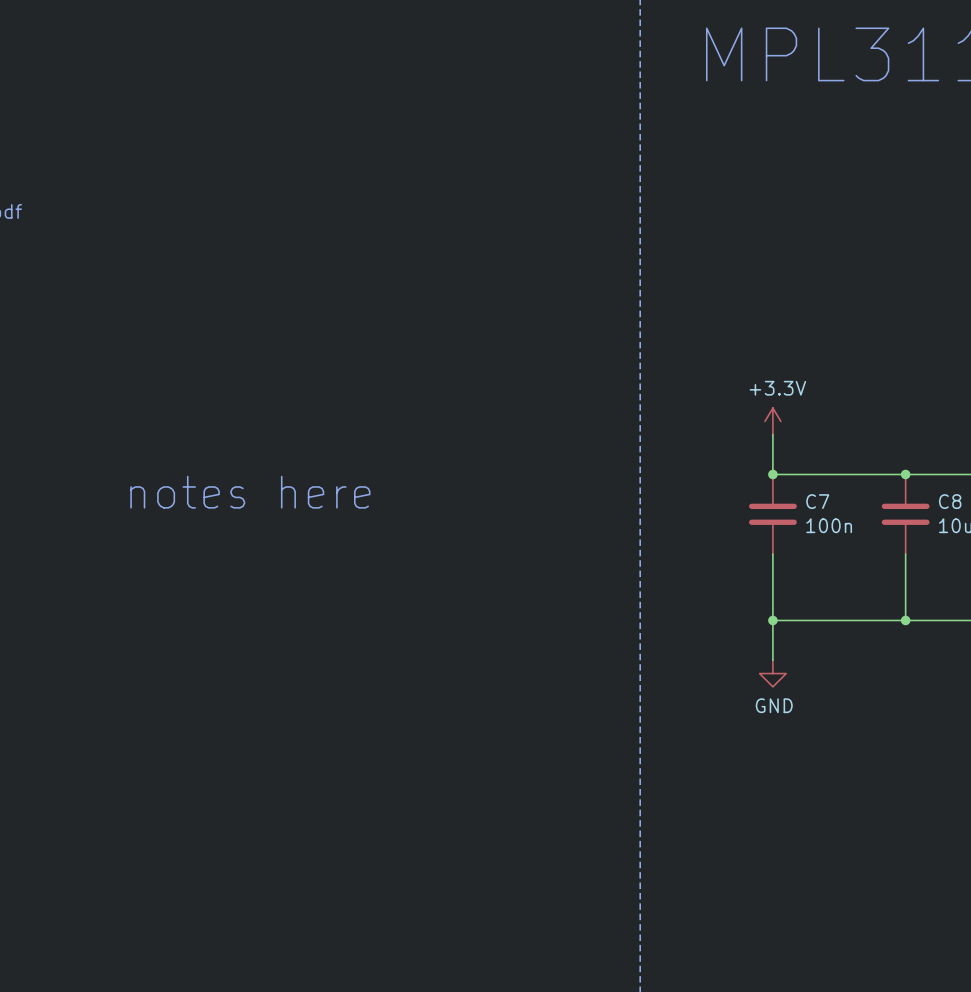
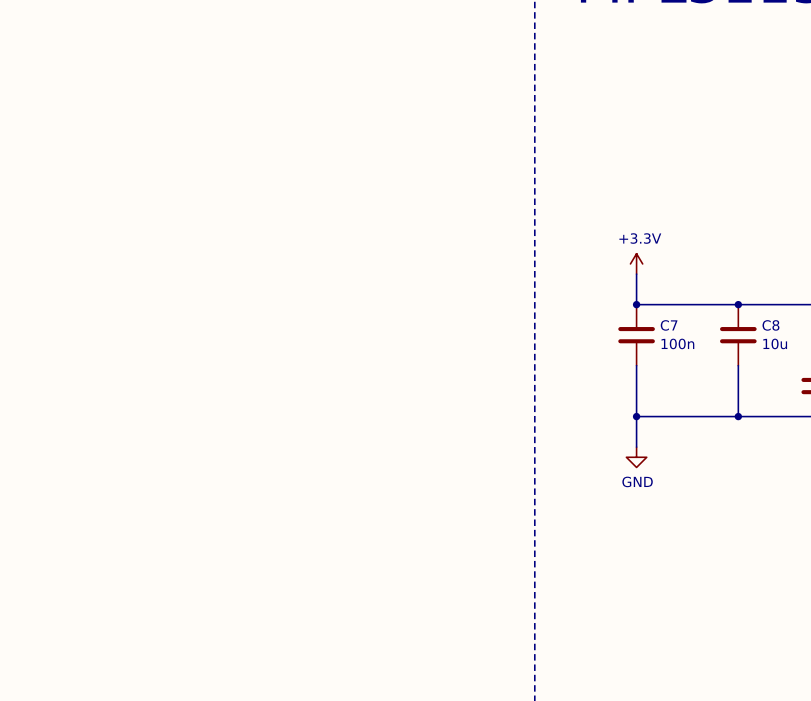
text: notes here (250, 492) -> none

